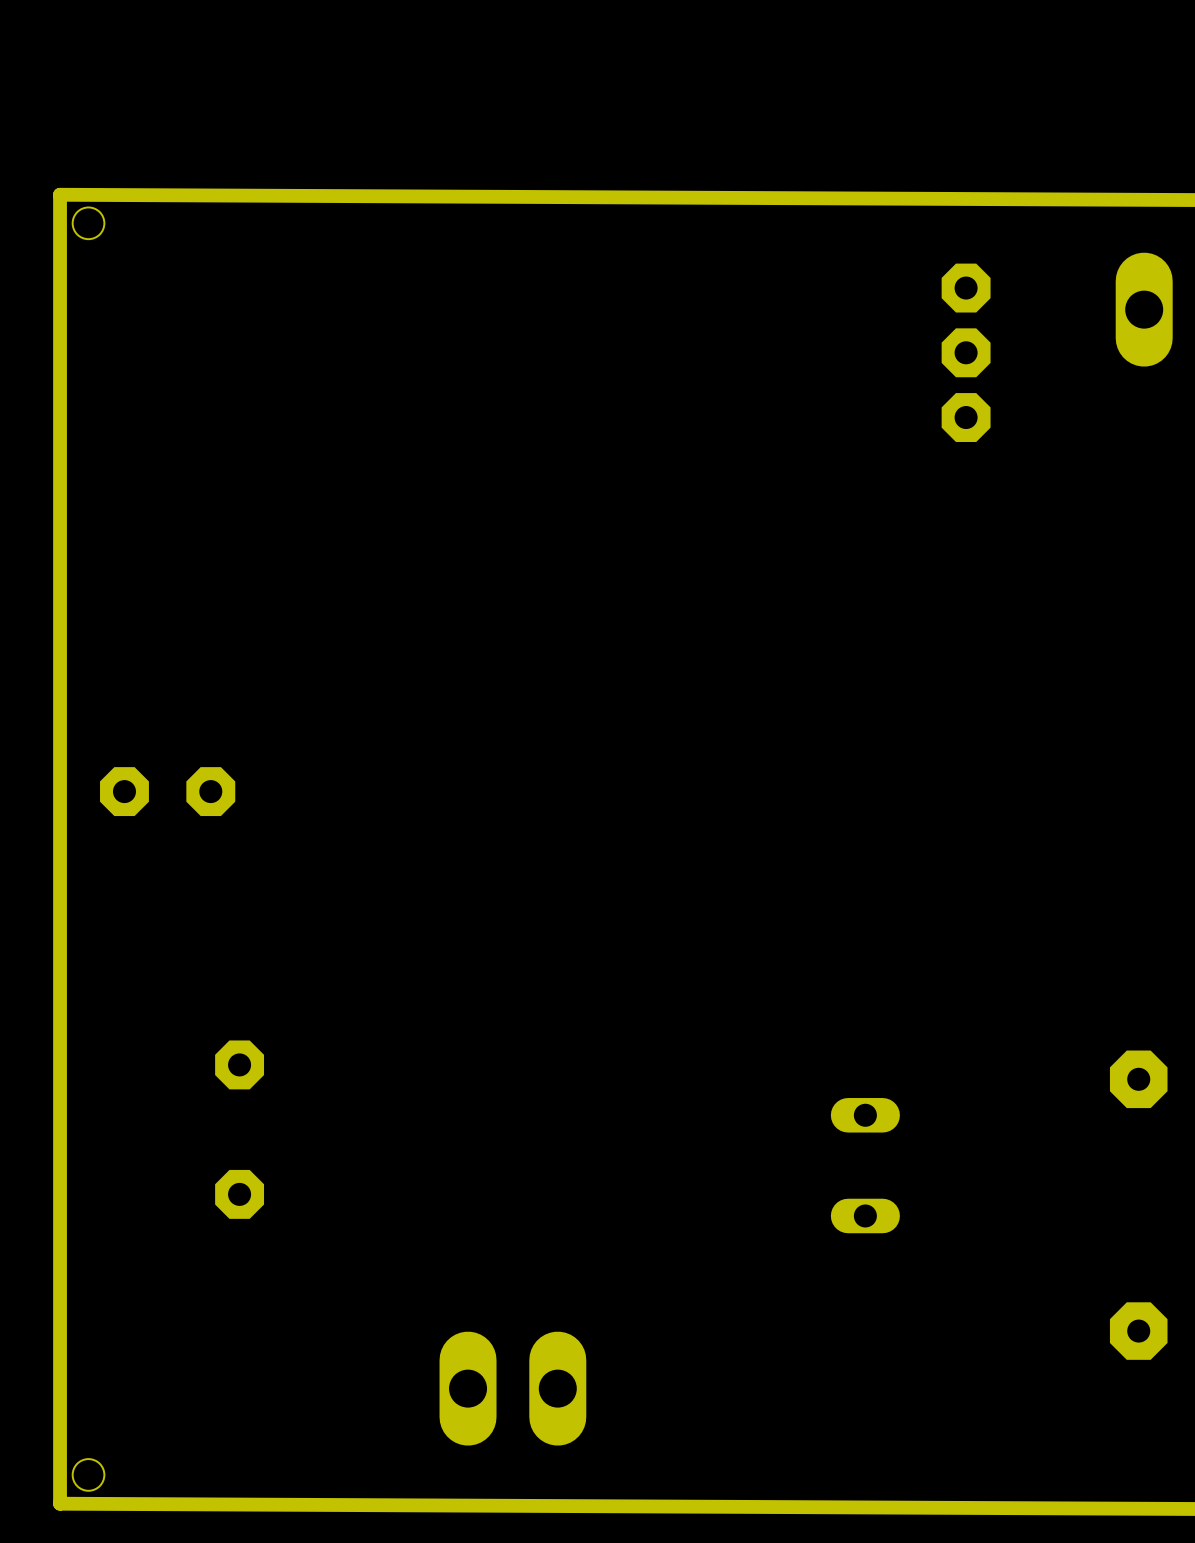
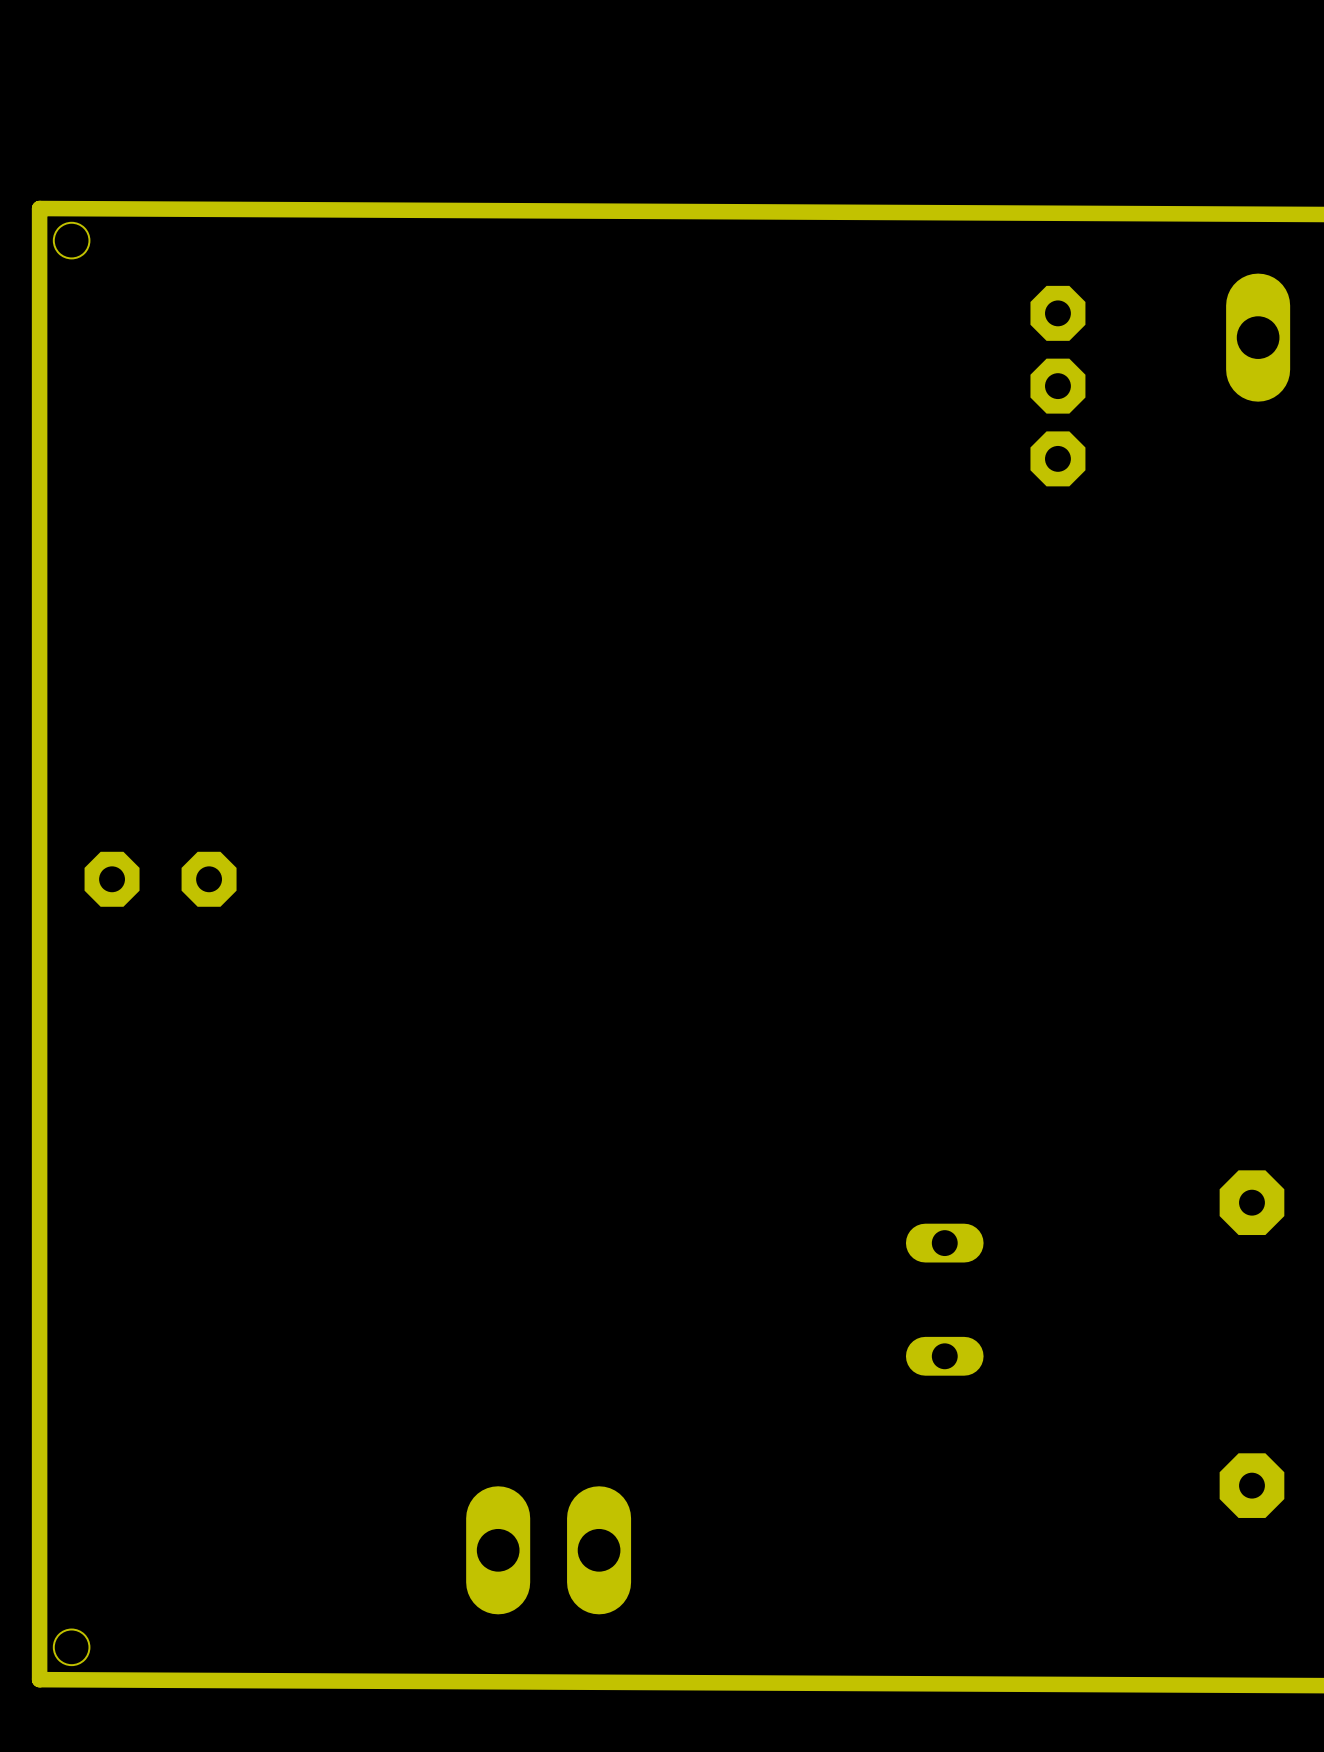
part: (239, 1064) -> none
part: (239, 1194) -> none

